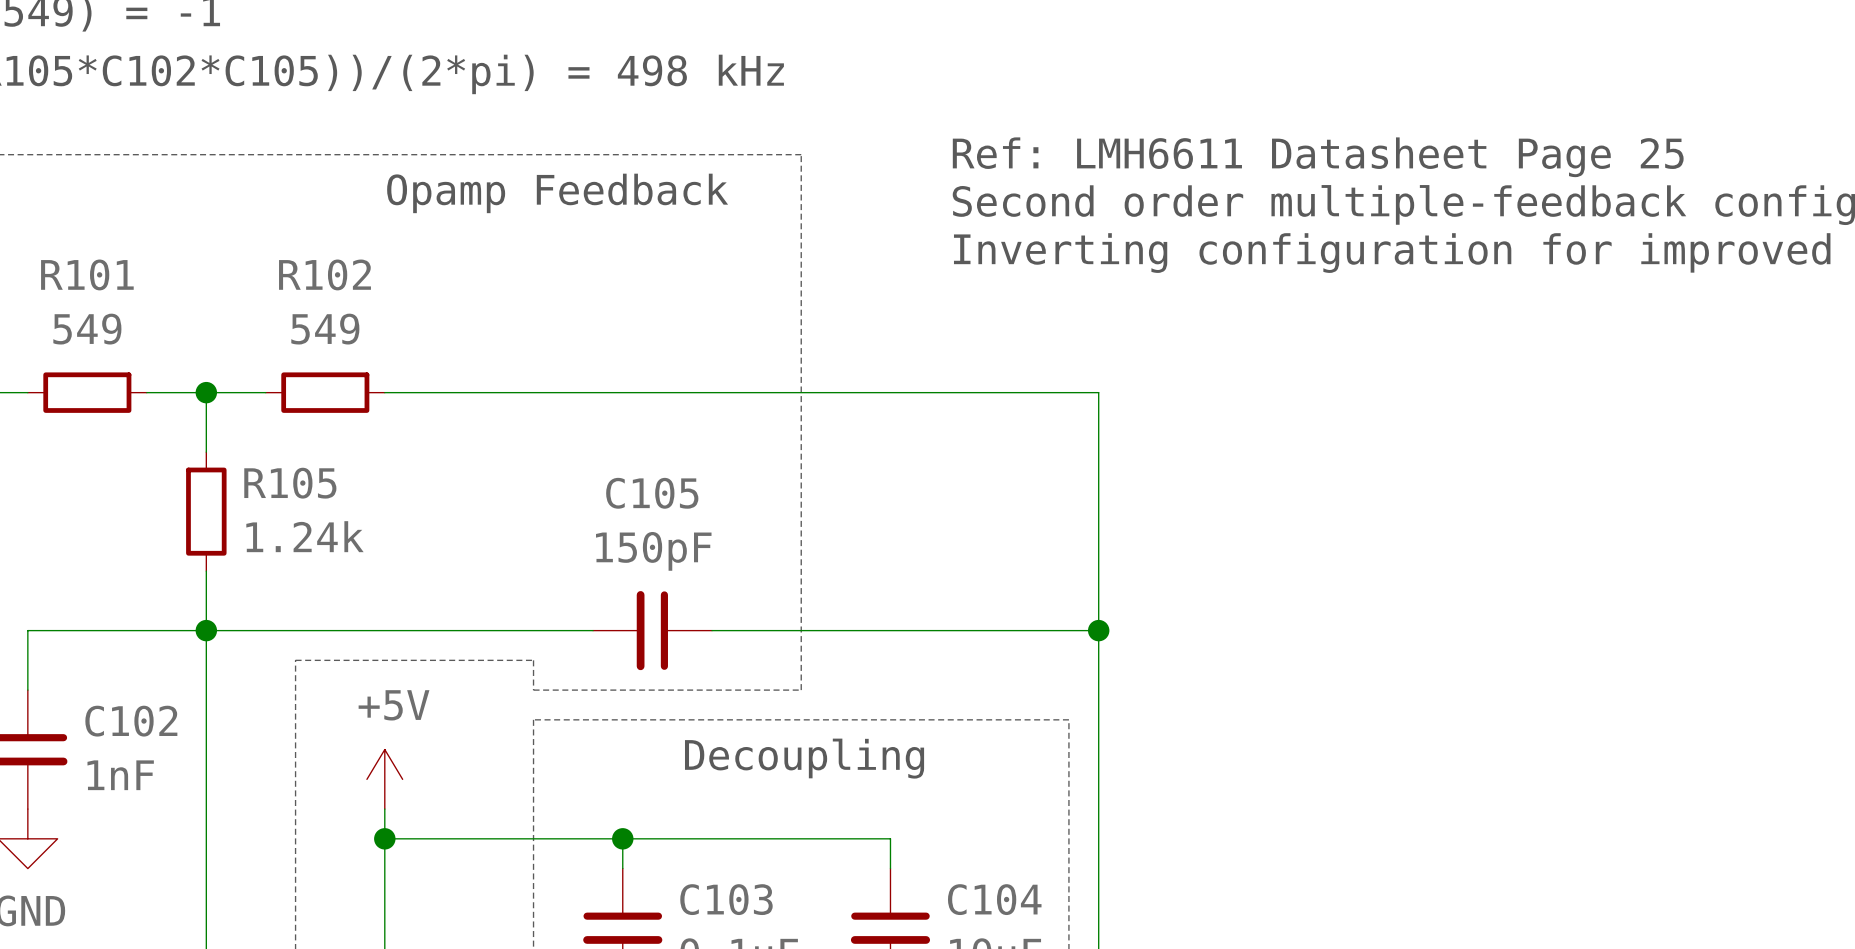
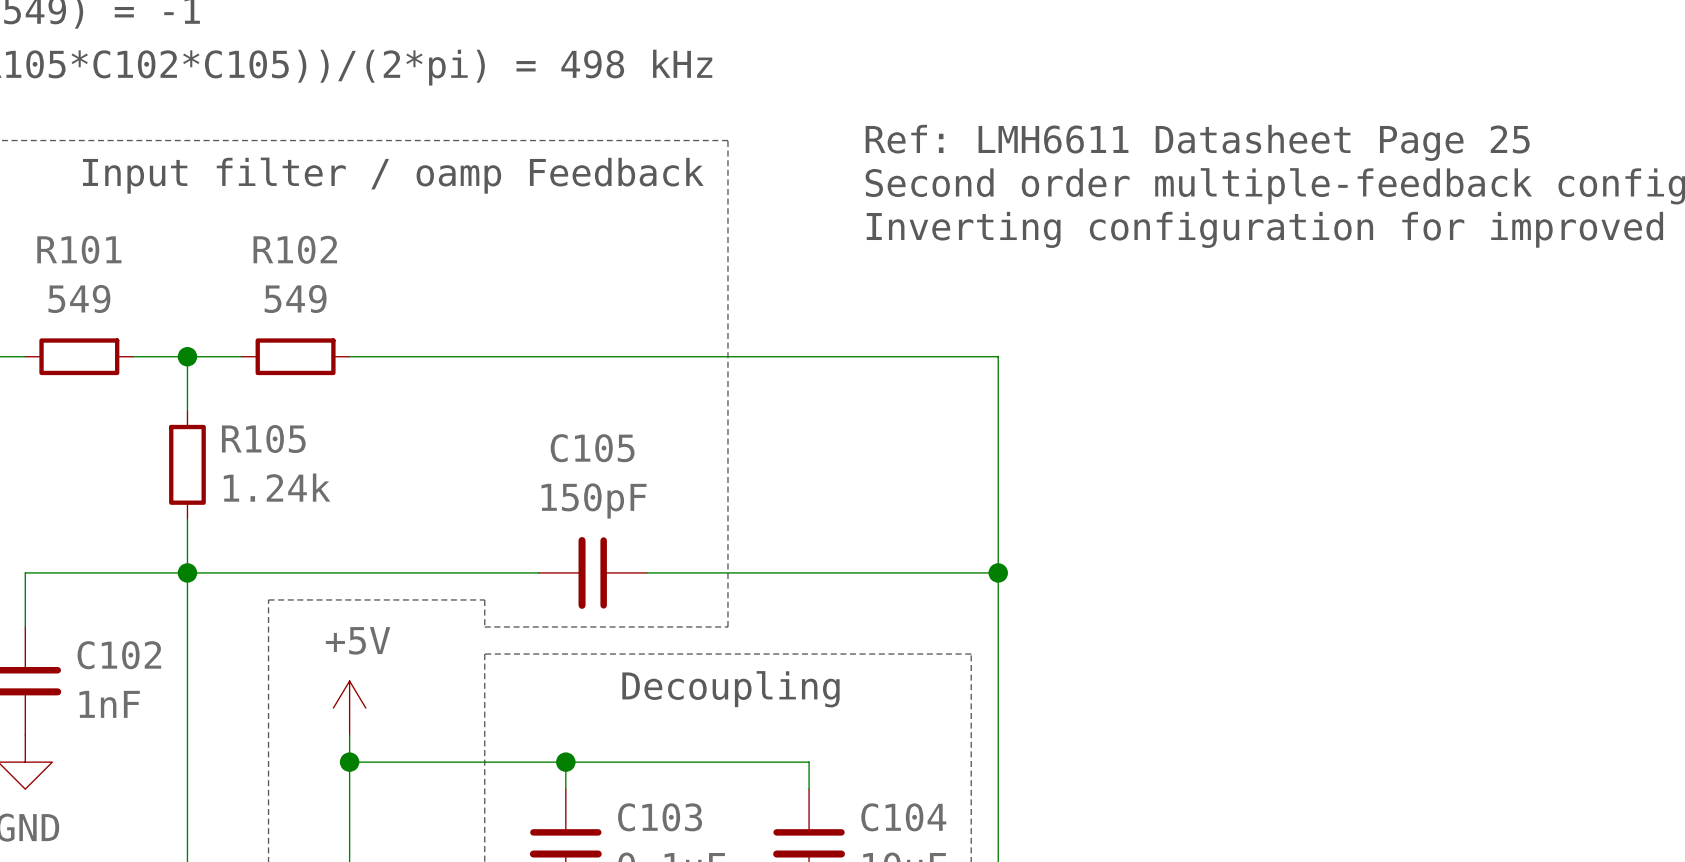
text: Opamp Feedback (557, 193) -> Input filter / oamp Feedback (393, 175)

